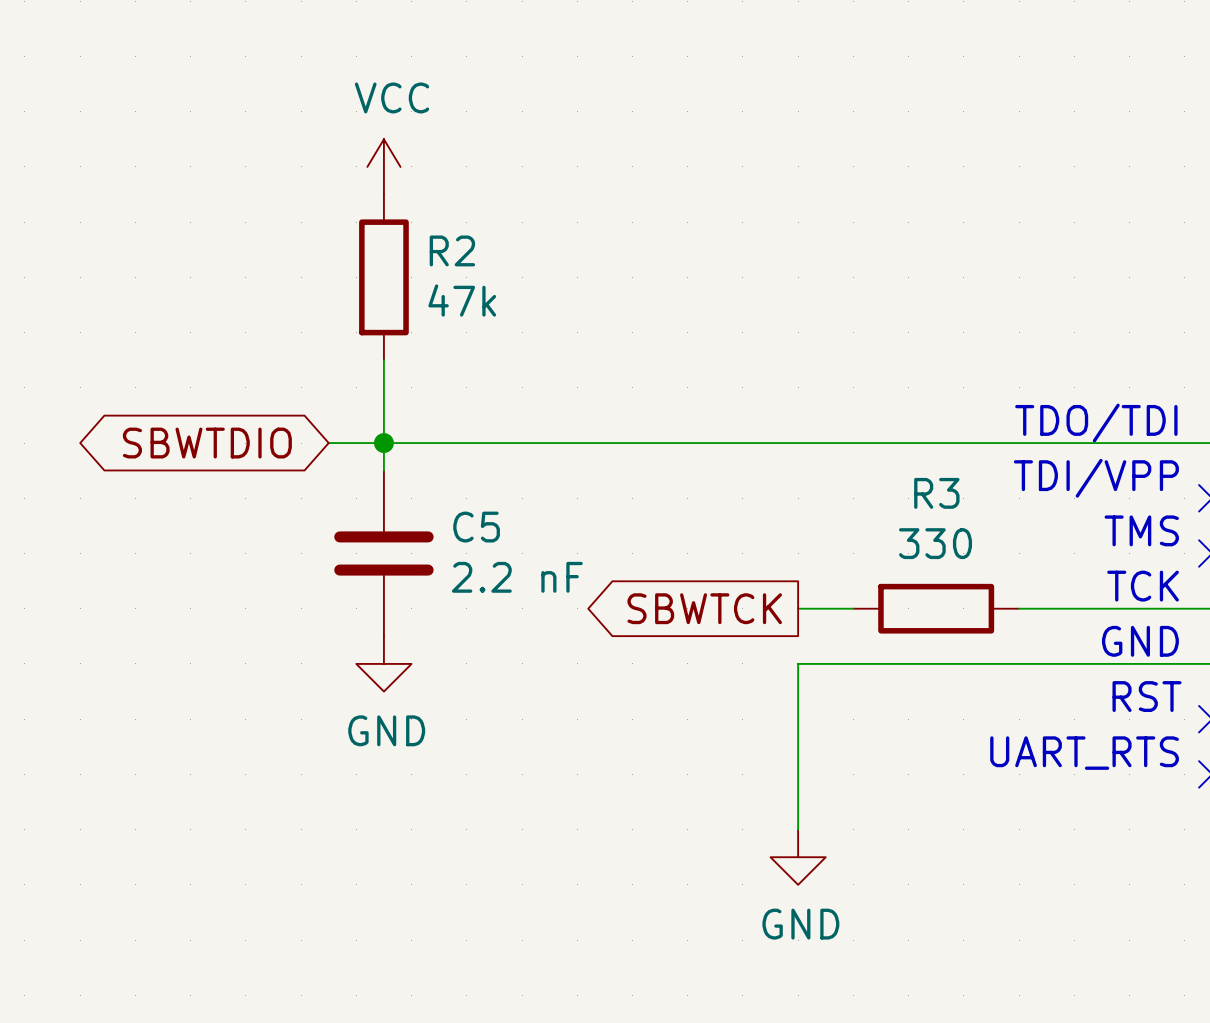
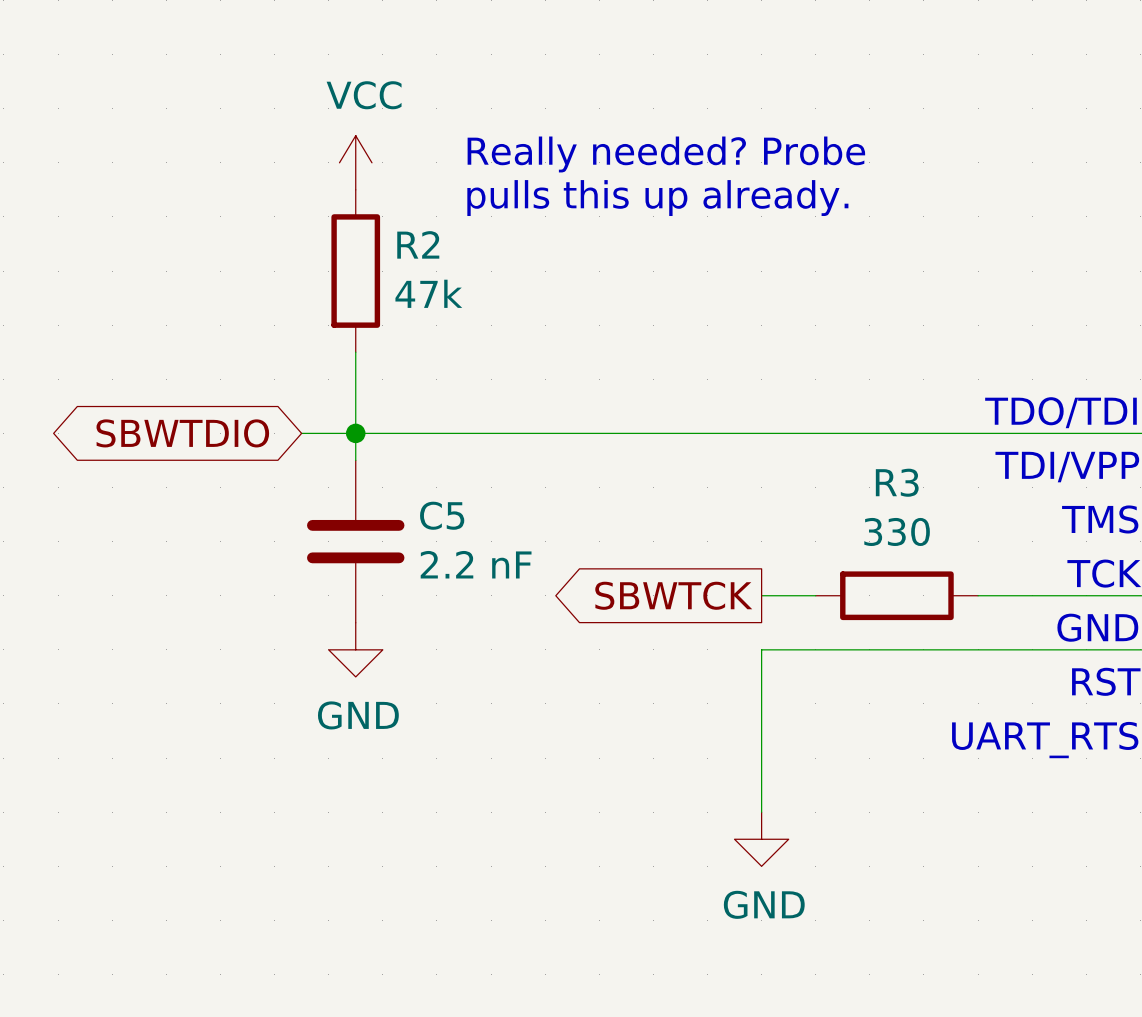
text: none -> Really needed? Probe (666, 154)
text: none -> pulls this up already. (657, 198)

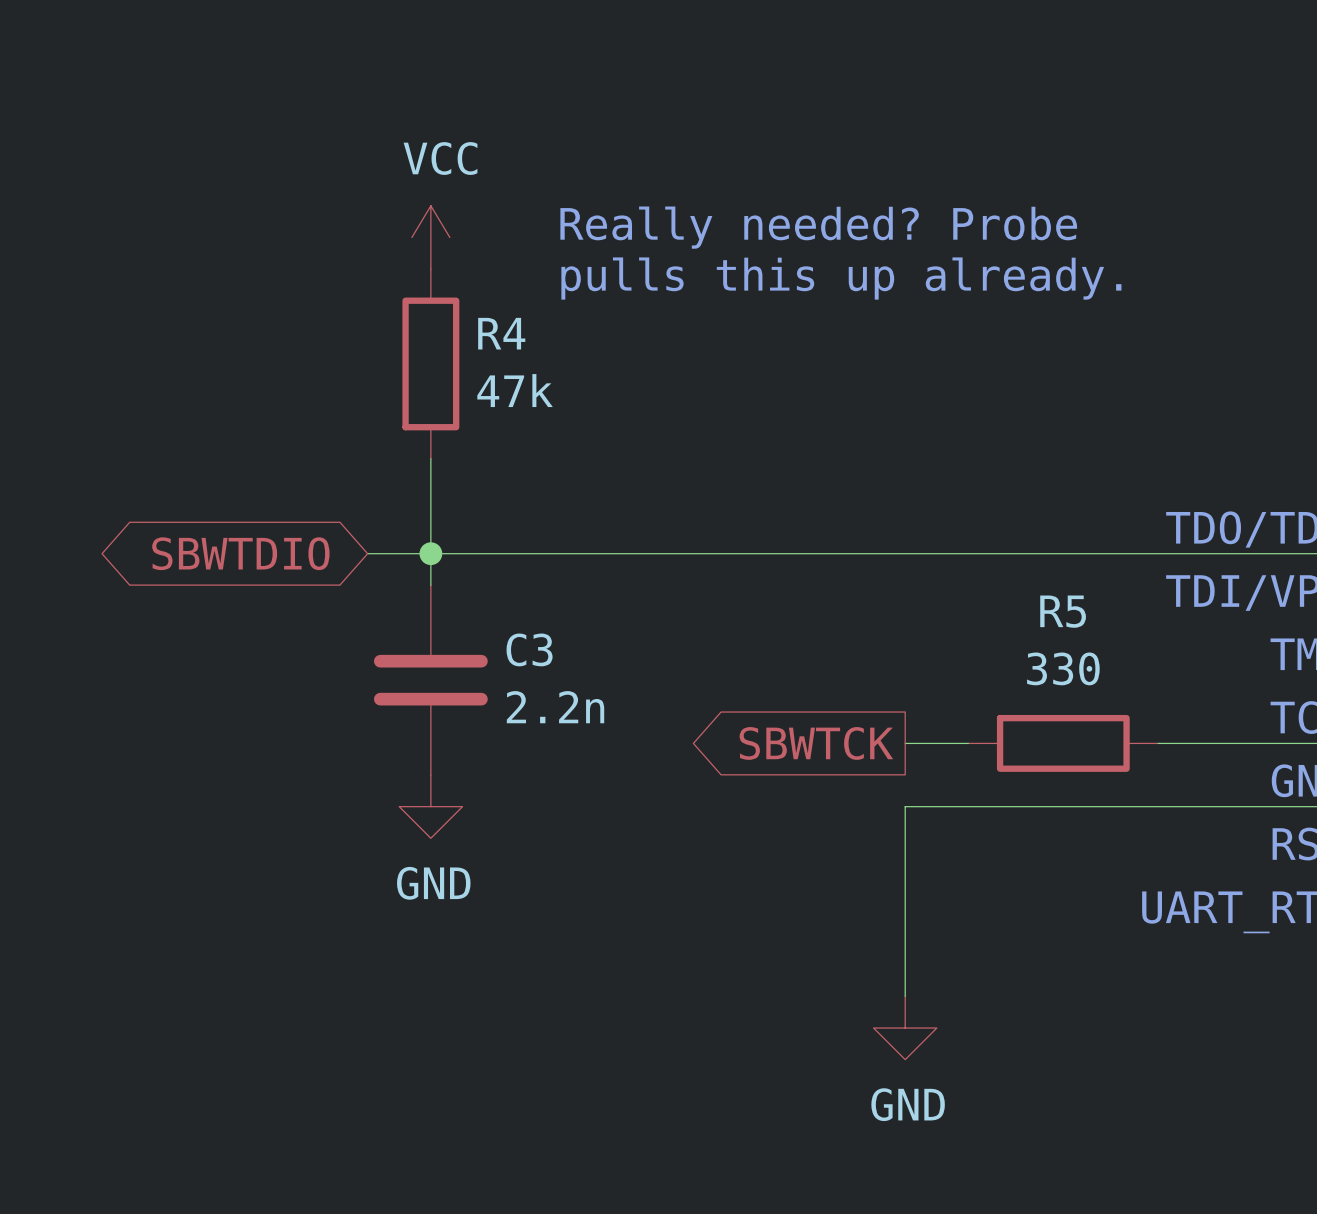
R2 name: R2 (418, 244) -> R4 (501, 333)
R3 name: R3 (897, 482) -> R5 (1063, 611)
C5 name: C5 (442, 515) -> C3 (529, 649)
C5 value: 2.2 nF (476, 564) -> 2.2n (555, 707)

